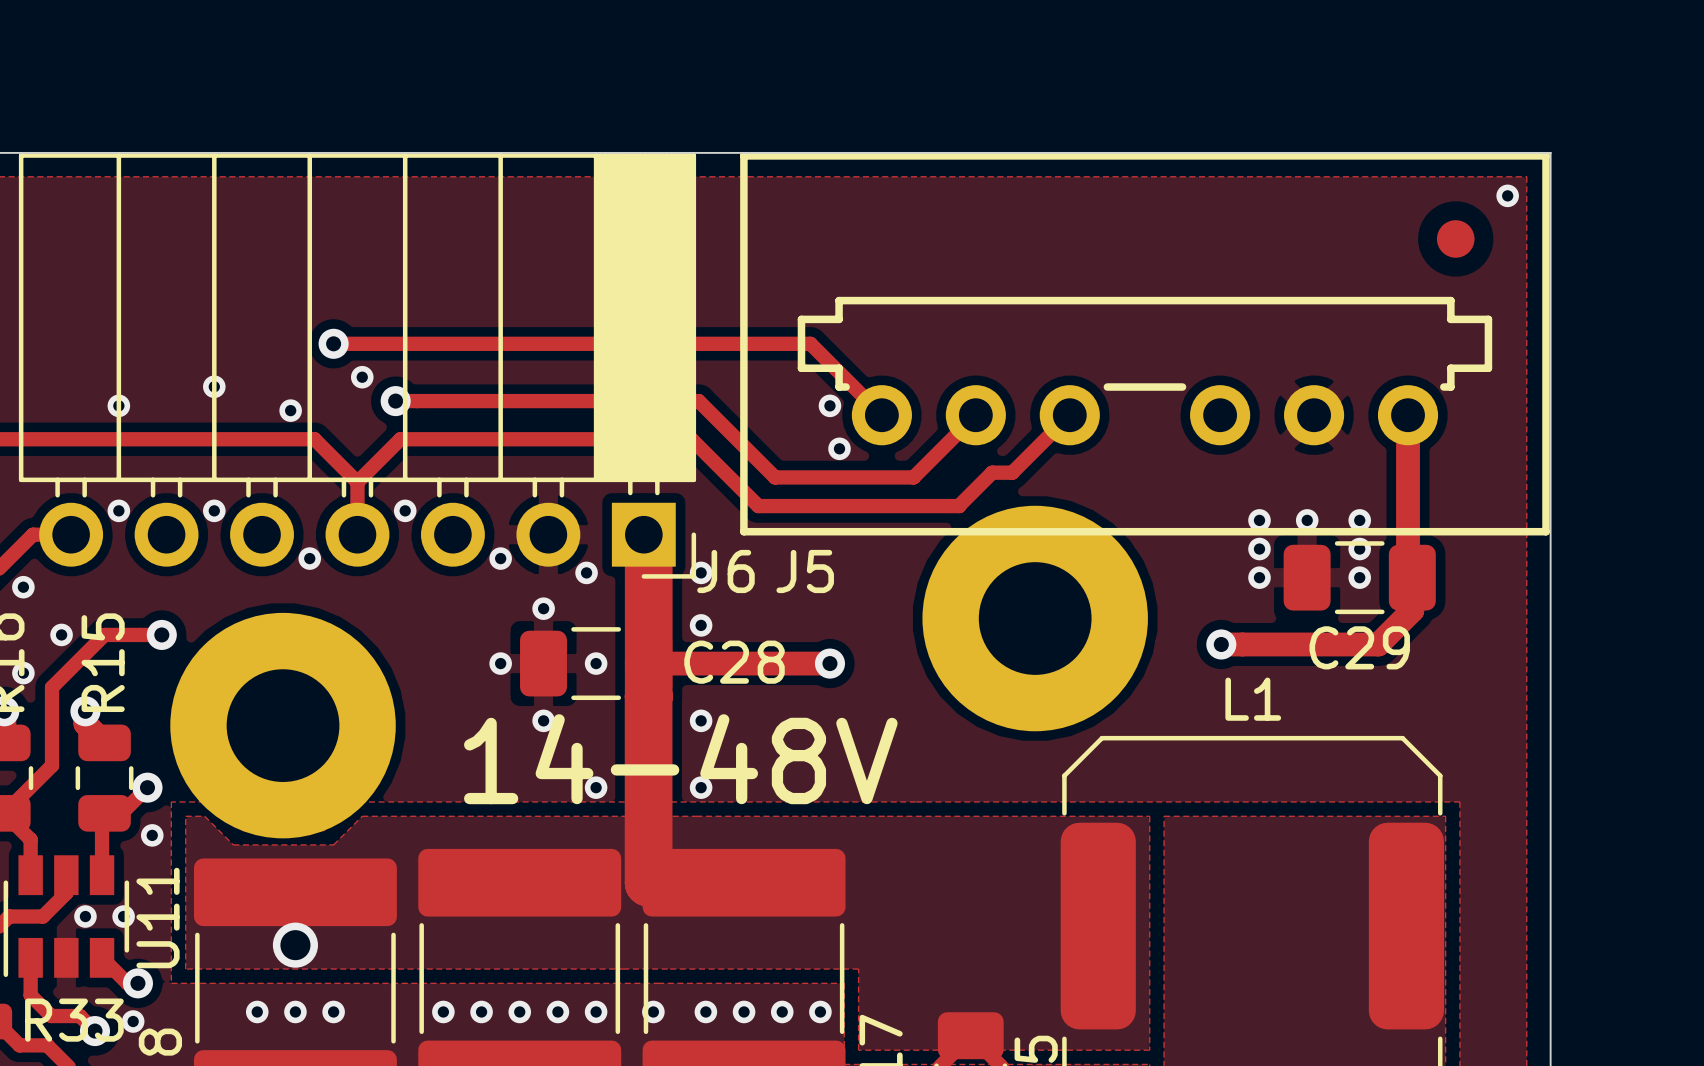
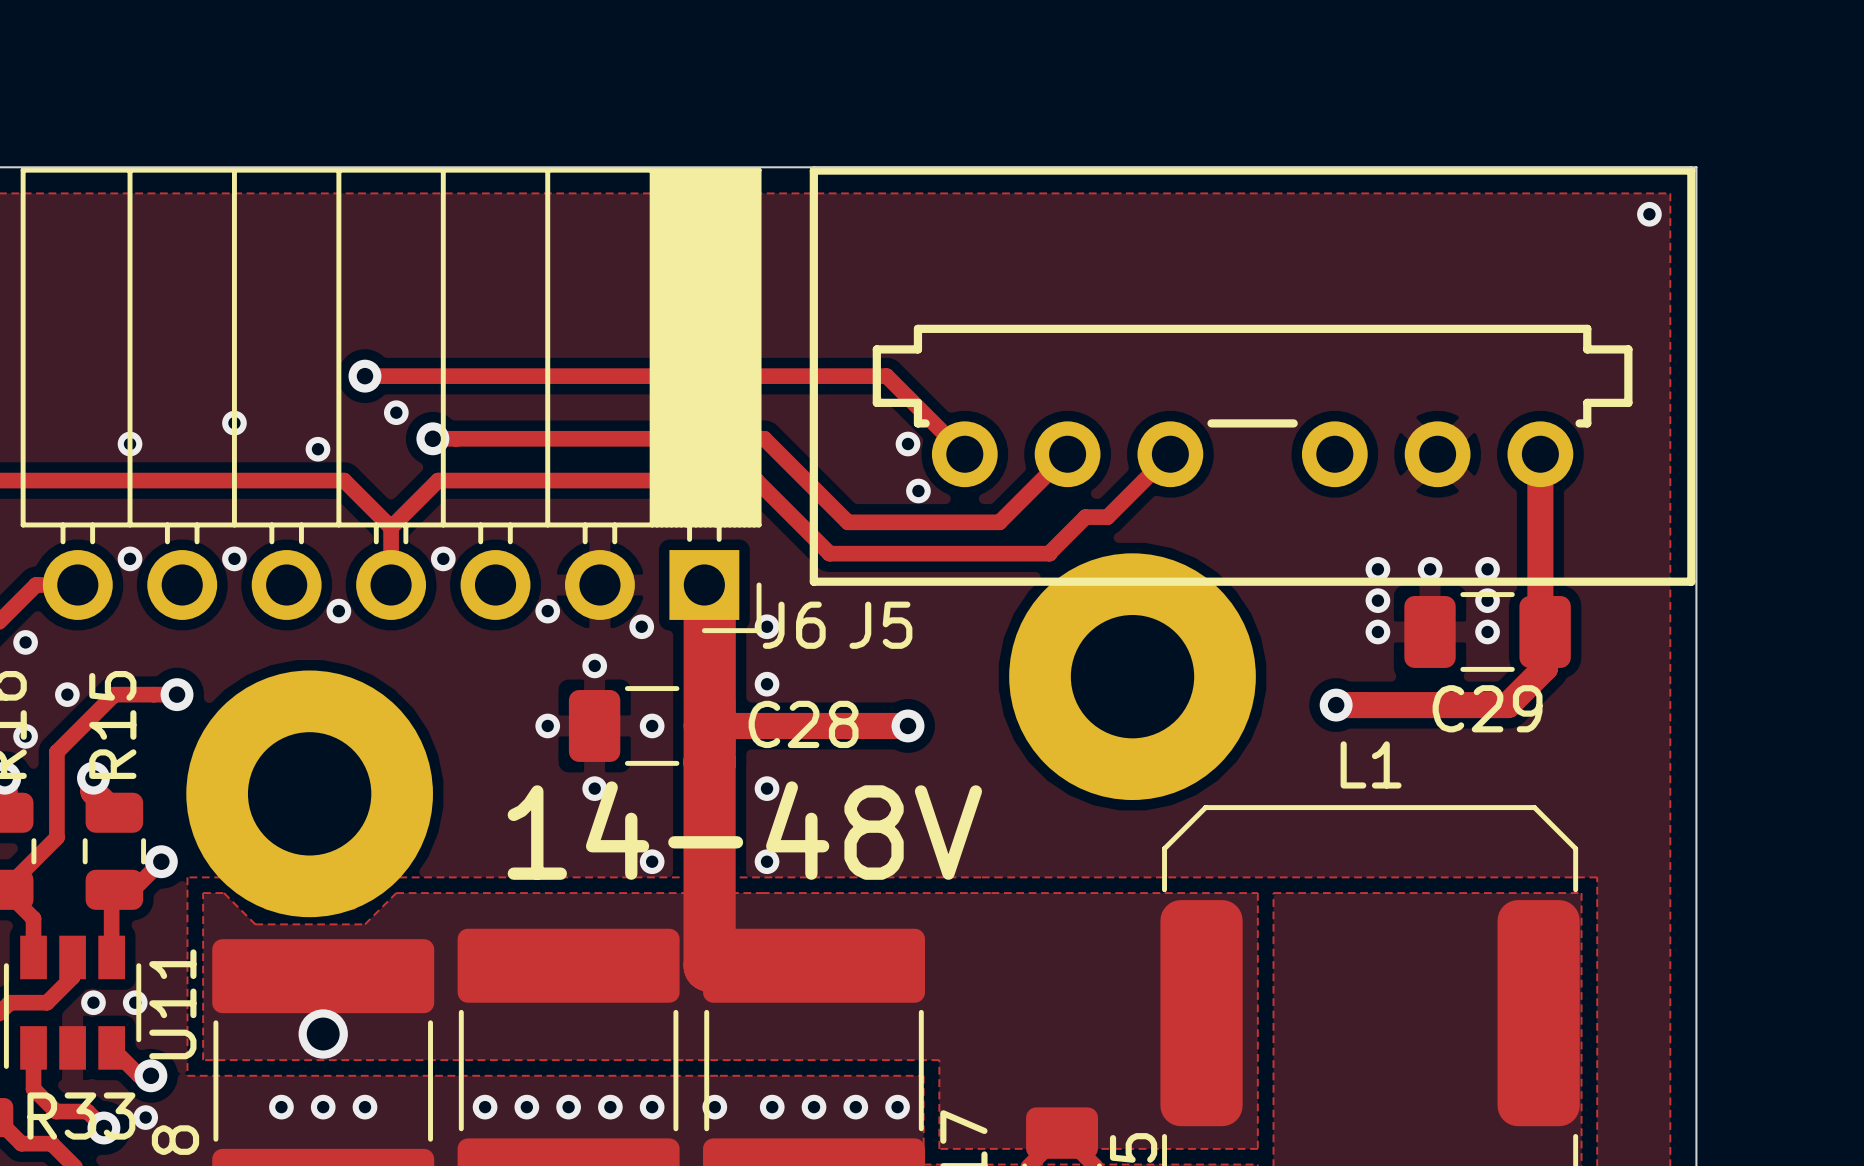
part: (1455, 238) -> none
via: (152, 835) -> none

